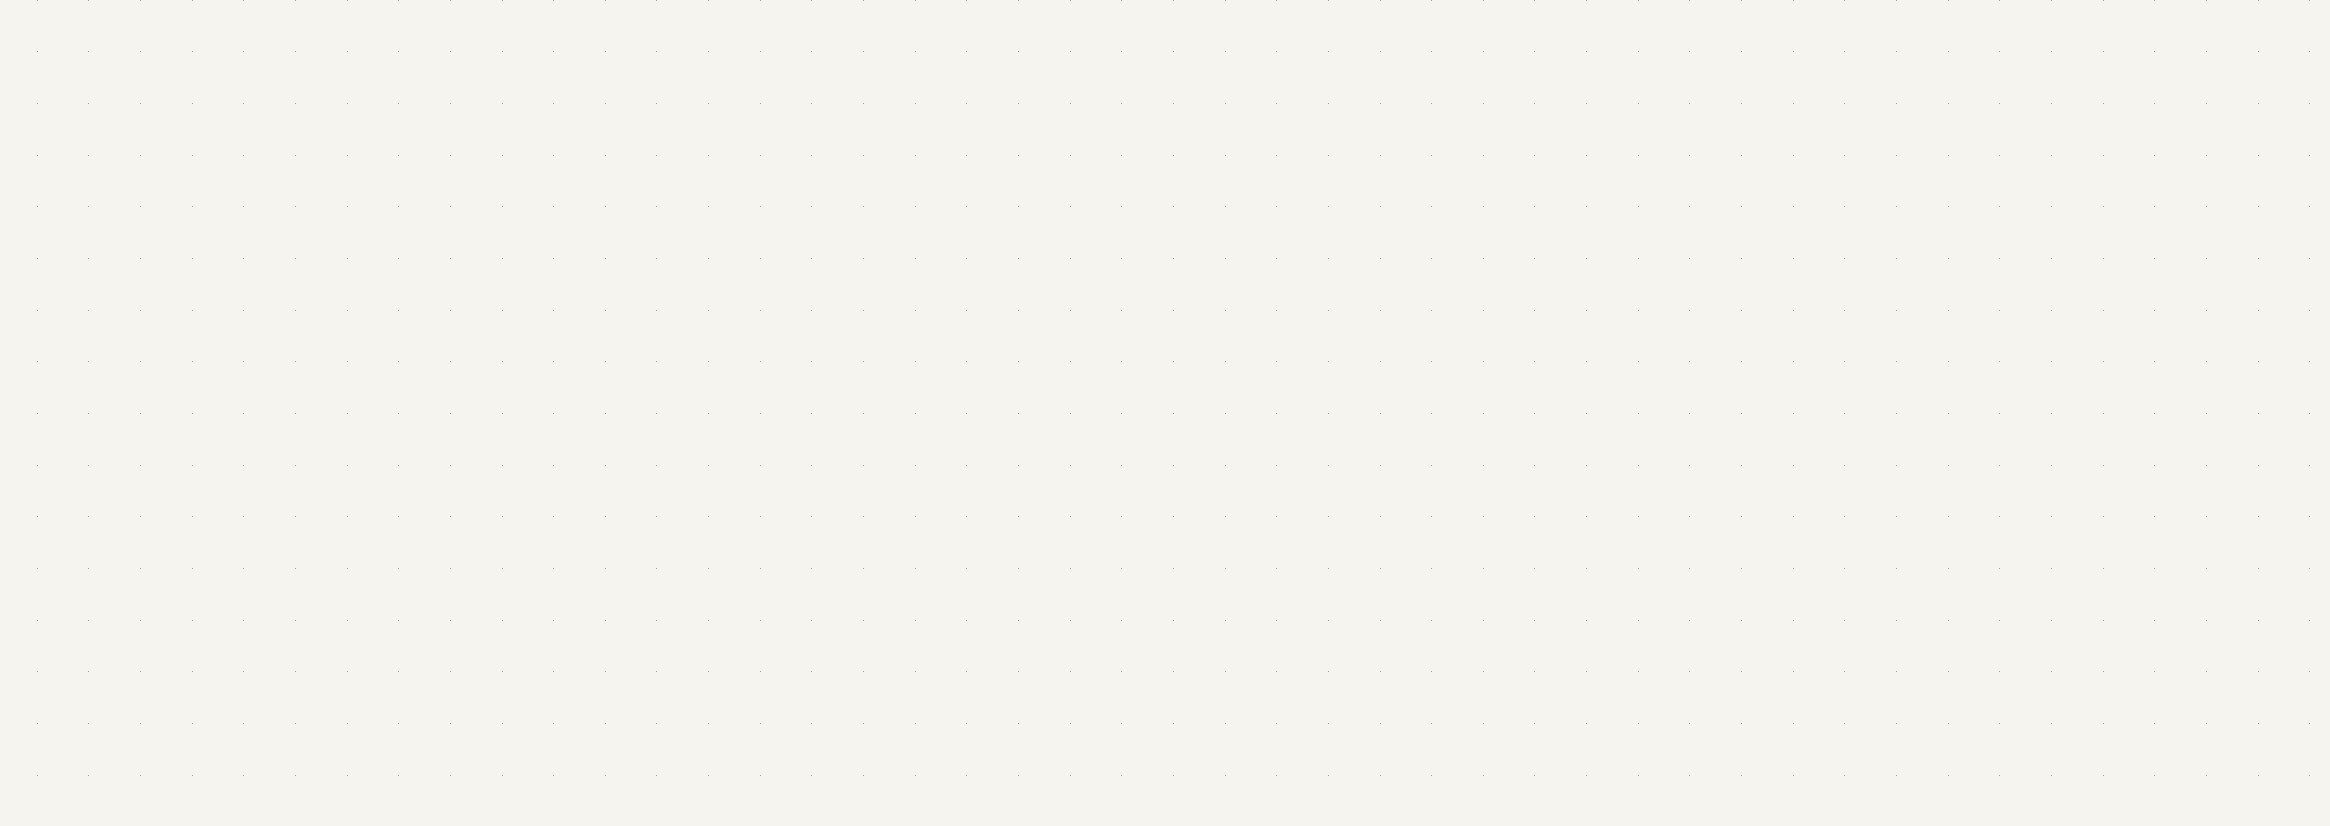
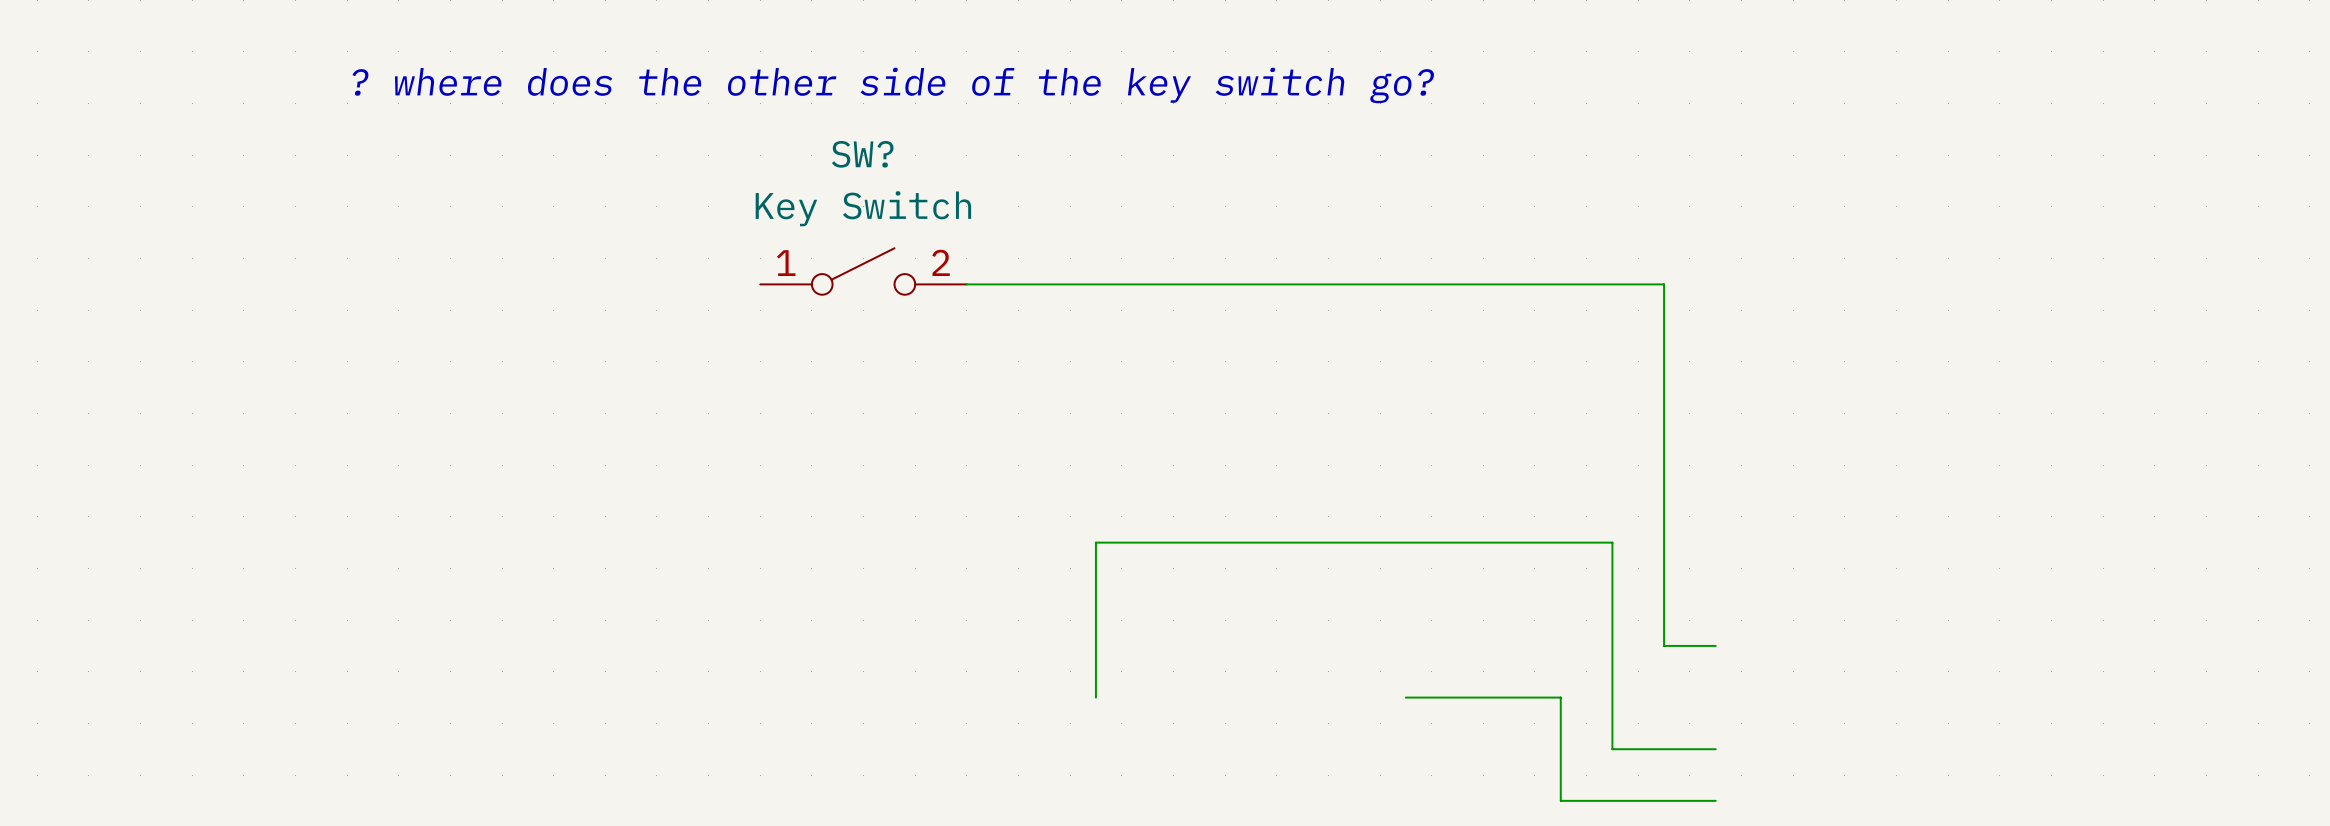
text: none -> ? where does the other side of the key switch go? (893, 85)
SW?: none -> Key Switch (863, 271)
wire: none -> (966, 284) (1664, 284) (1664, 645) (1715, 645)
wire: none -> (1095, 697) (1095, 542) (1612, 542) (1612, 749) (1715, 749)
wire: none -> (1405, 697) (1560, 697) (1560, 800) (1715, 800)

